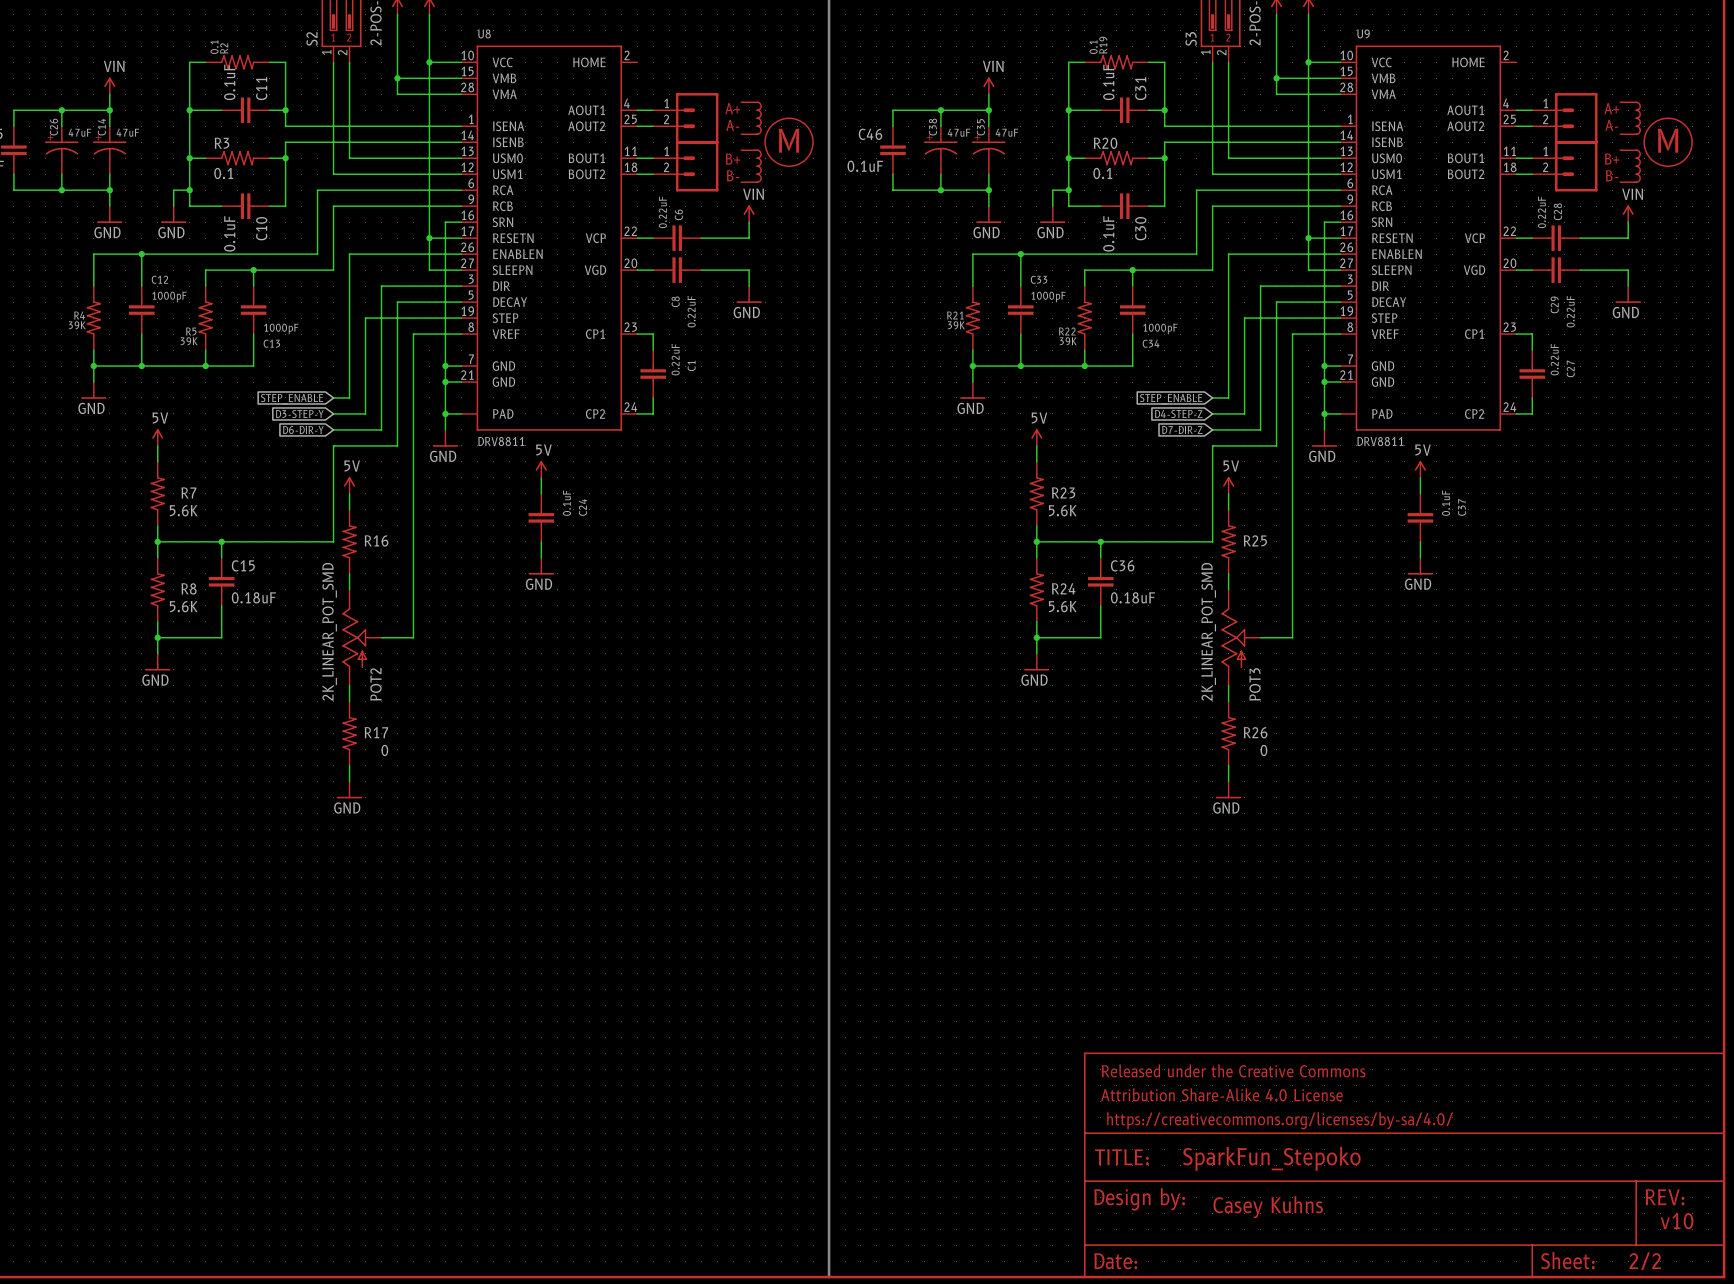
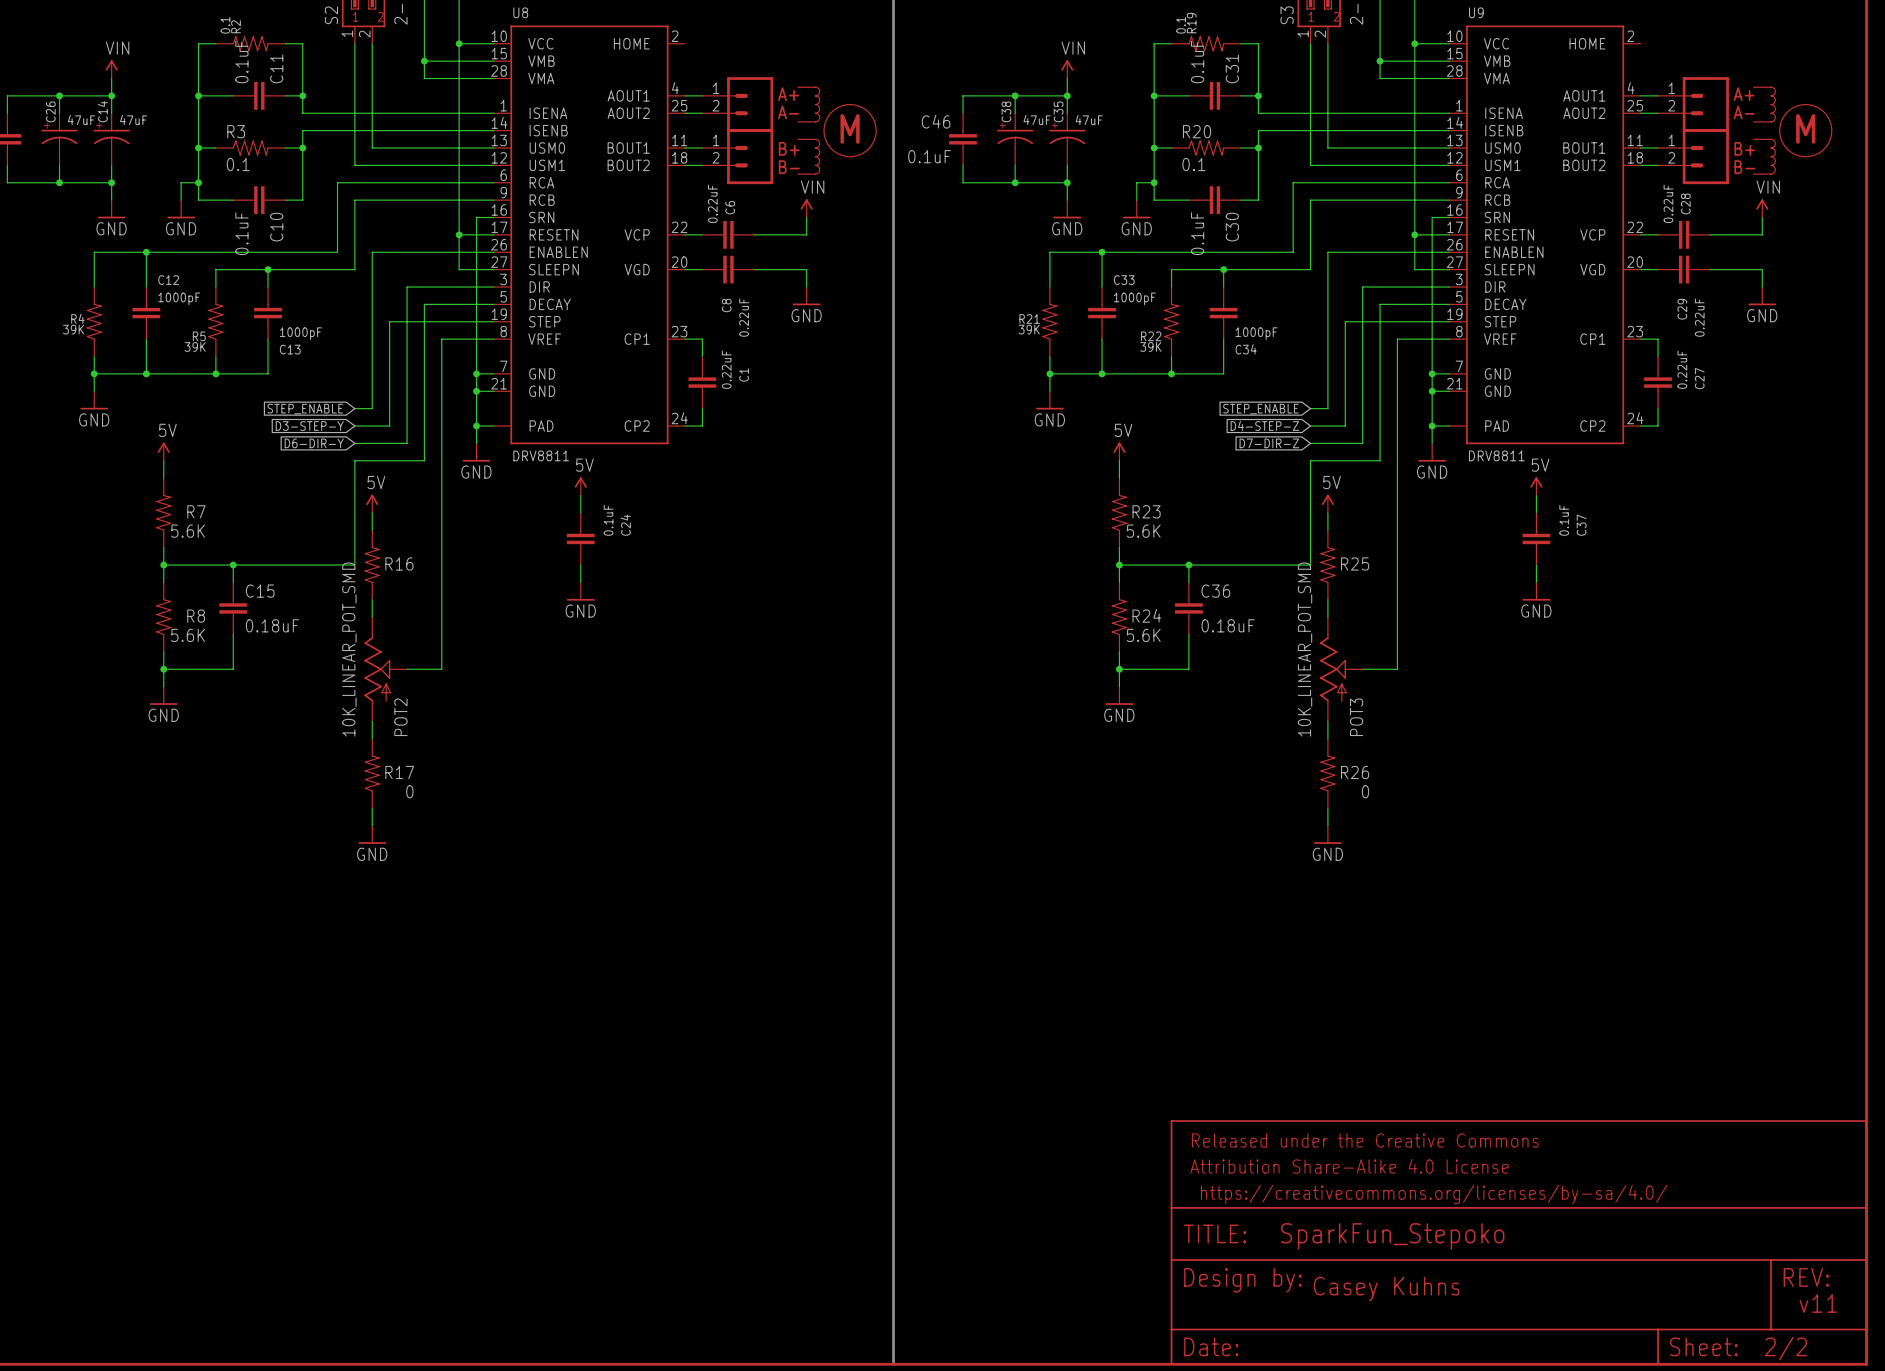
POT2 value: 2K_LINEAR_POT_SMD (329, 631) -> 10K_LINEAR_POT_SMD (349, 649)
POT3 value: 2K_LINEAR_POT_SMD (1208, 631) -> 10K_LINEAR_POT_SMD (1305, 649)
text: v10 (1677, 1221) -> v11 (1818, 1303)

